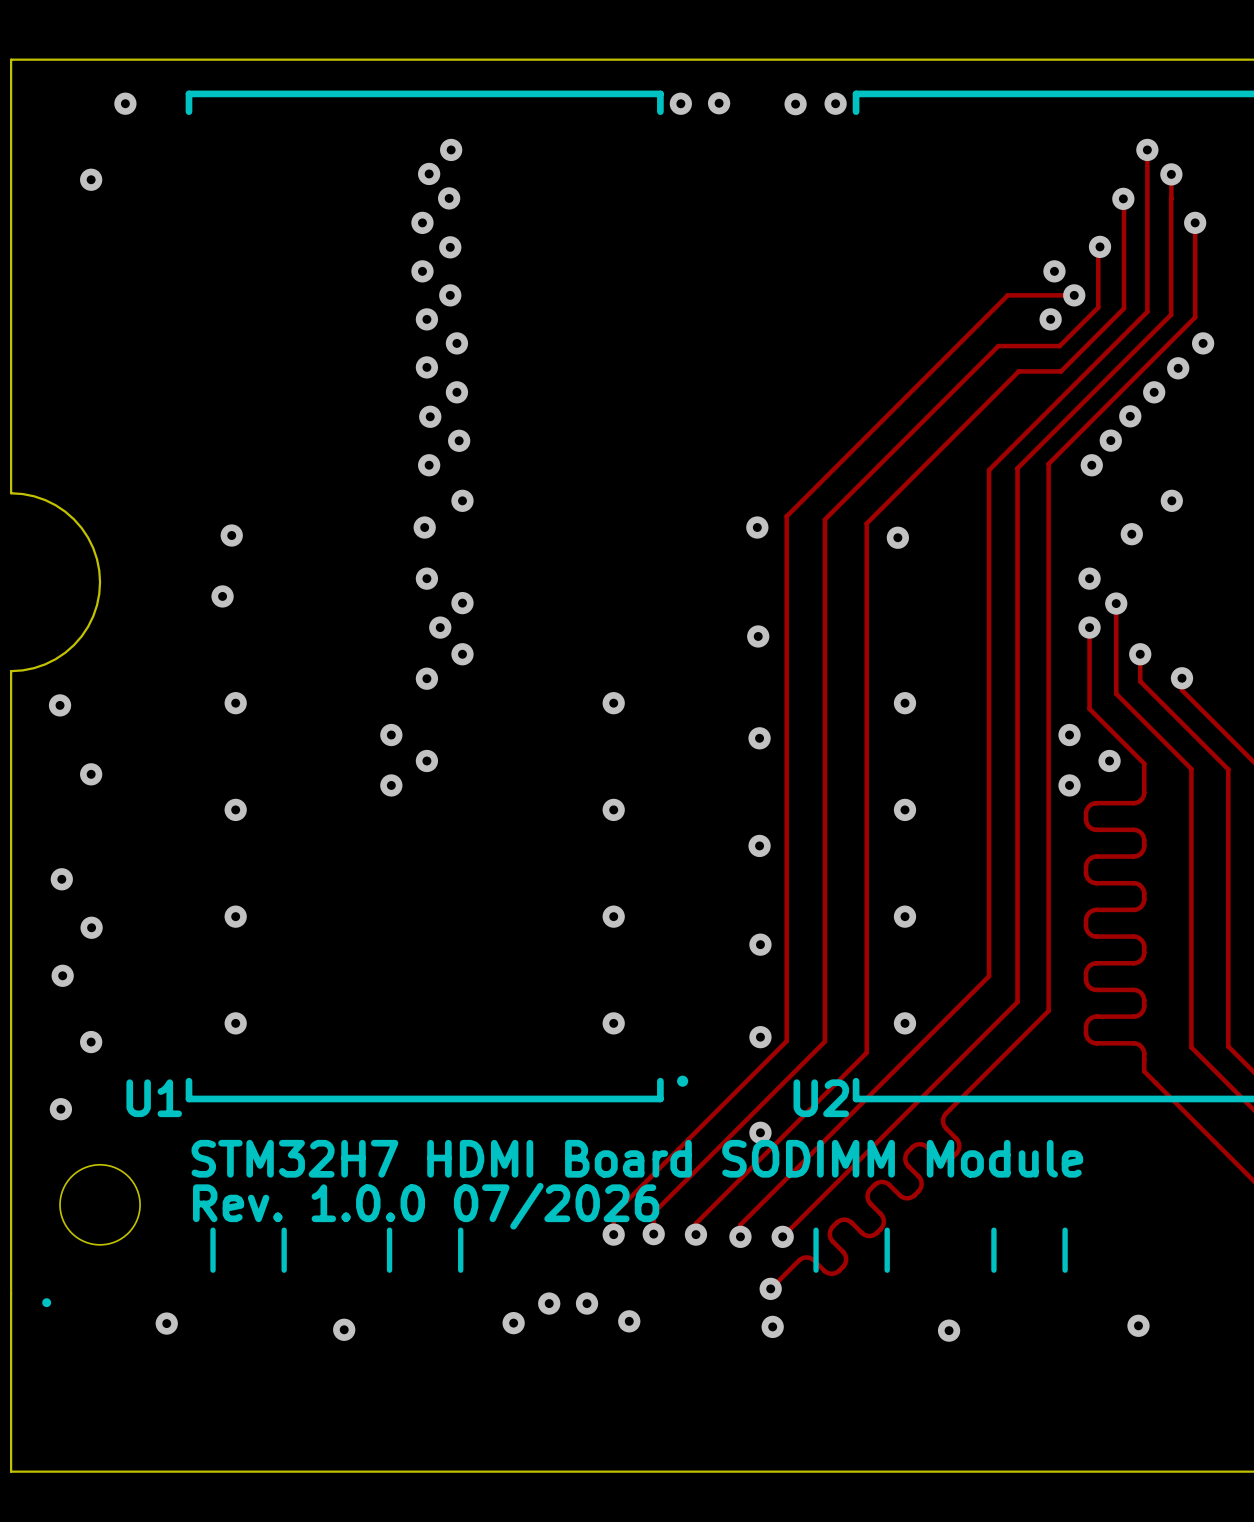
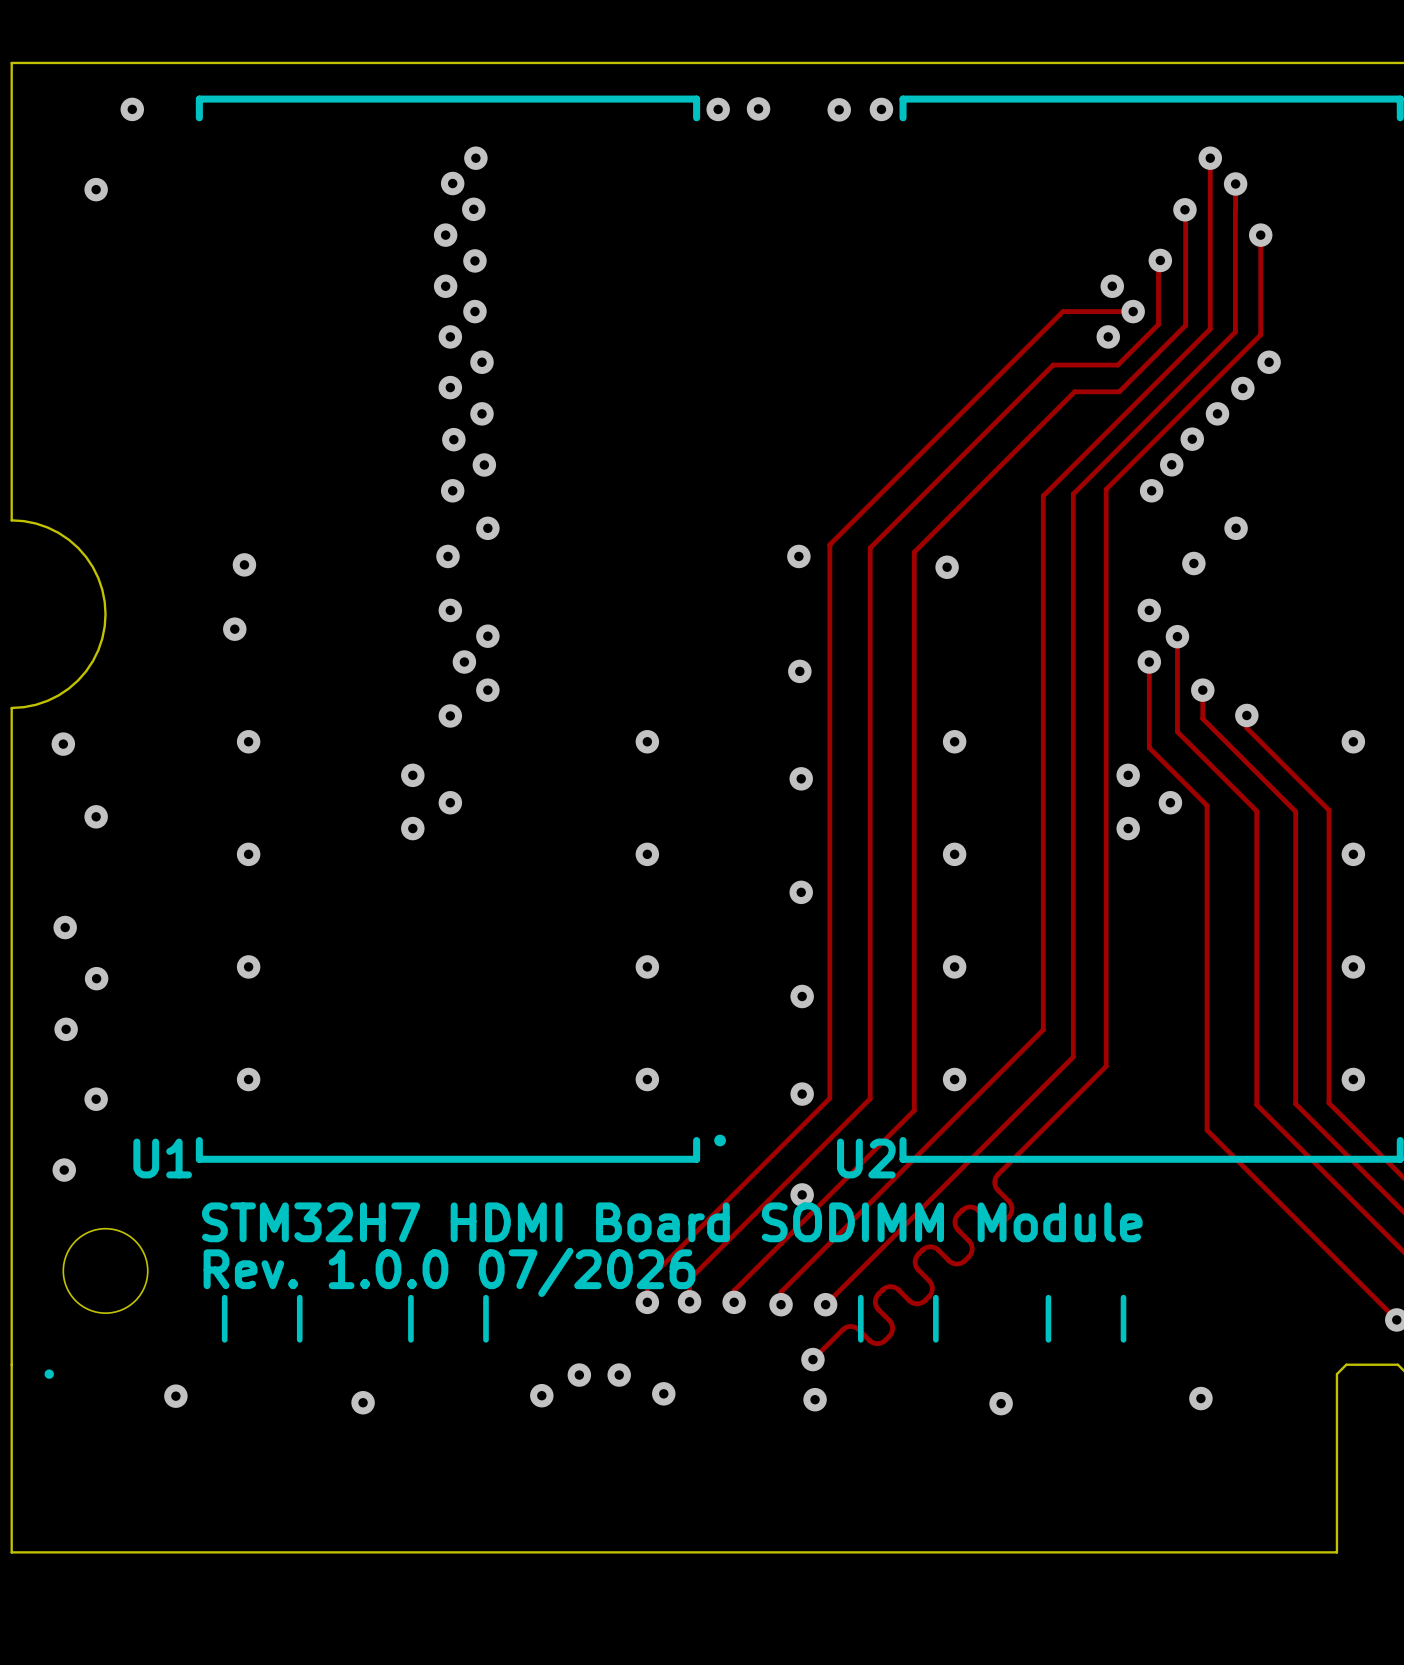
track: (1144, 792) (1142, 798) (1137, 802) (1094, 803) (1088, 807) (1085, 813) (1086, 822) (1092, 828) (1135, 830) (1141, 833) (1144, 840) -> (1207, 835) (1207, 886)
track: (1144, 845) (1142, 851) (1137, 855) (1094, 856) (1088, 860) (1085, 867) (1086, 876) (1092, 882) (1135, 883) (1141, 887) (1144, 893) -> (1207, 892) (1207, 942)
track: (1144, 899) (1141, 905) (1135, 909) (1093, 910) (1088, 913) (1085, 920) (1086, 929) (1092, 935) (1135, 936) (1141, 940) (1144, 947) -> (1207, 948) (1207, 999)
track: (1144, 952) (1141, 959) (1137, 962) (1094, 963) (1088, 967) (1085, 973) (1086, 982) (1092, 988) (1135, 990) (1141, 993) (1144, 1000) -> (1207, 1004) (1207, 1055)
track: (1144, 1005) (1141, 1012) (1135, 1016) (1093, 1017) (1087, 1021) (1085, 1027) (1086, 1036) (1092, 1042) (1135, 1043) (1141, 1047) (1144, 1053) -> (1207, 1061) (1207, 1111)

